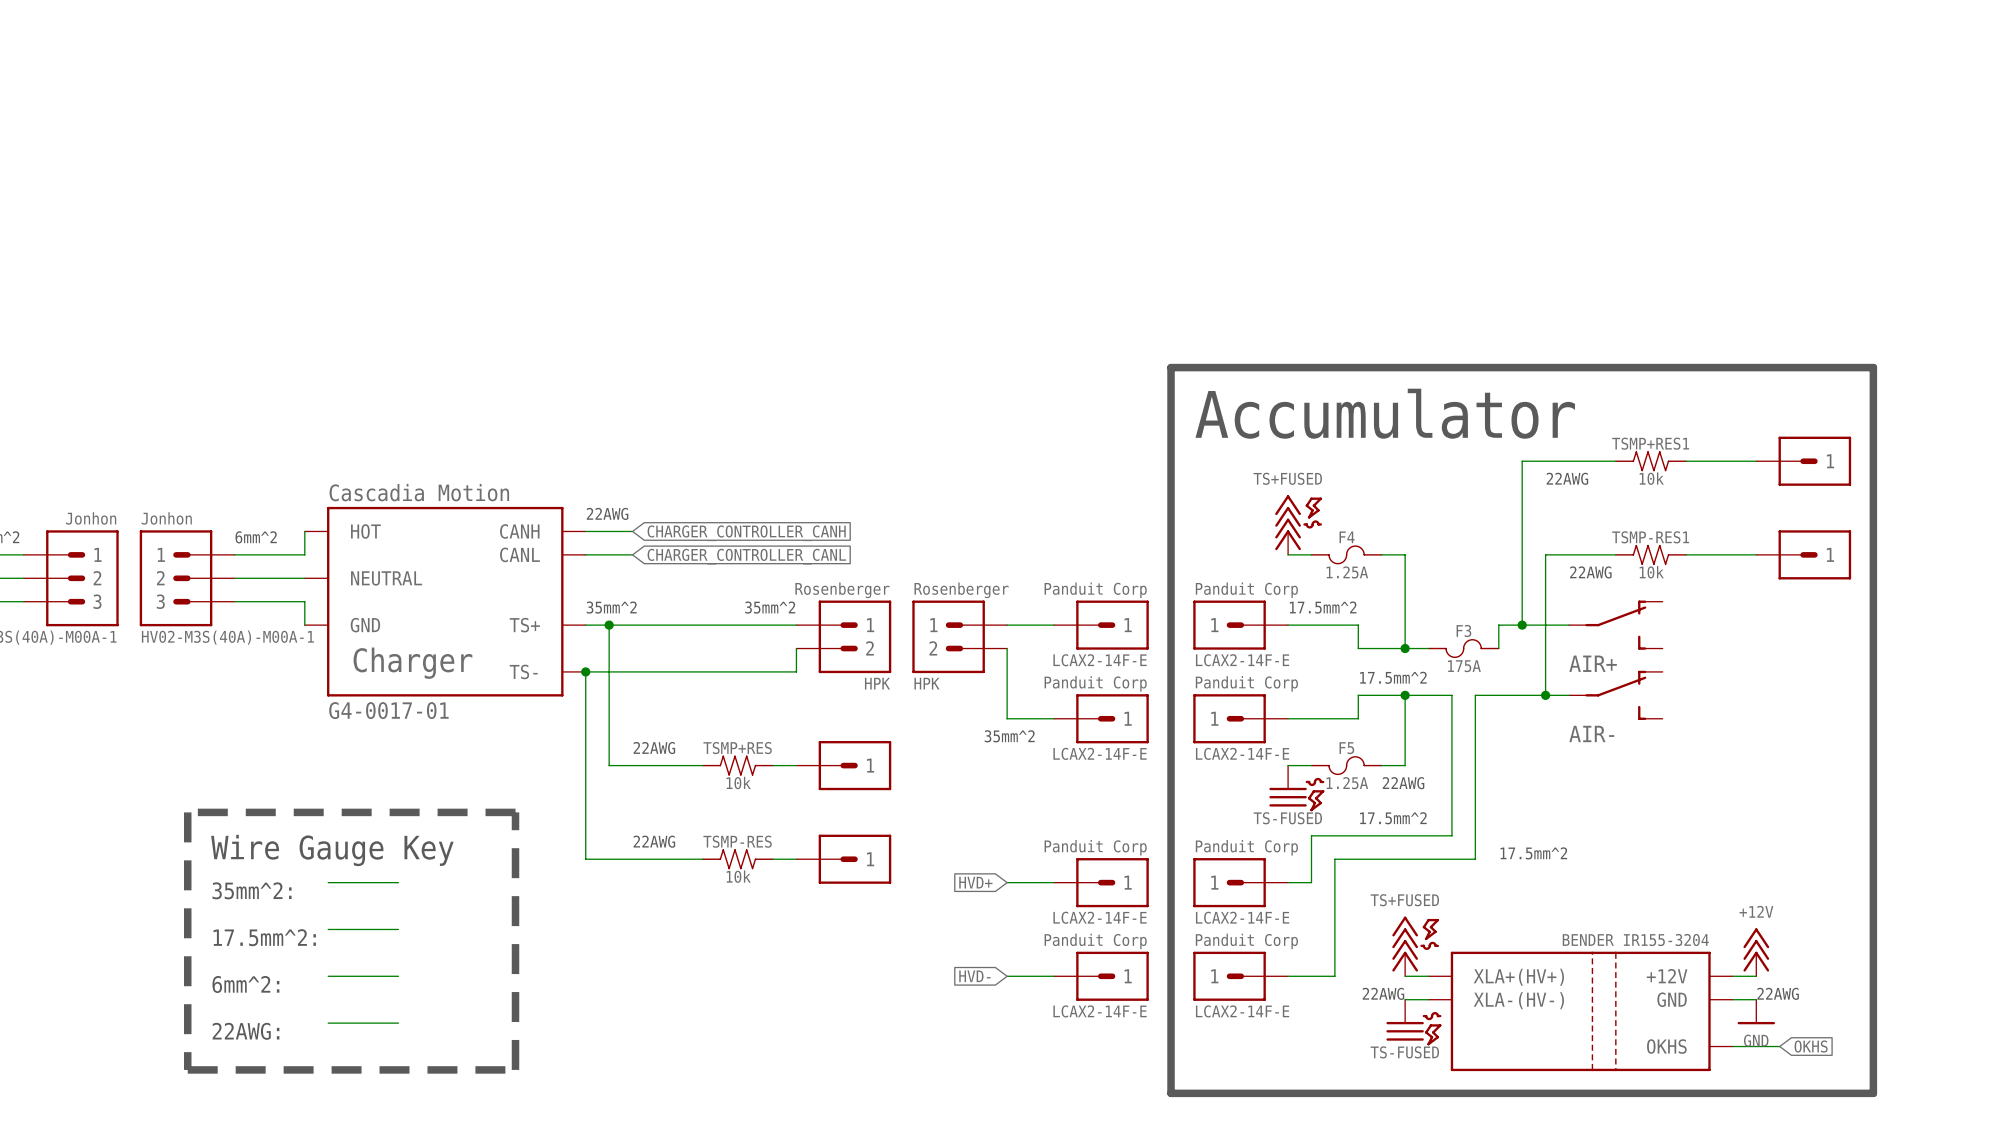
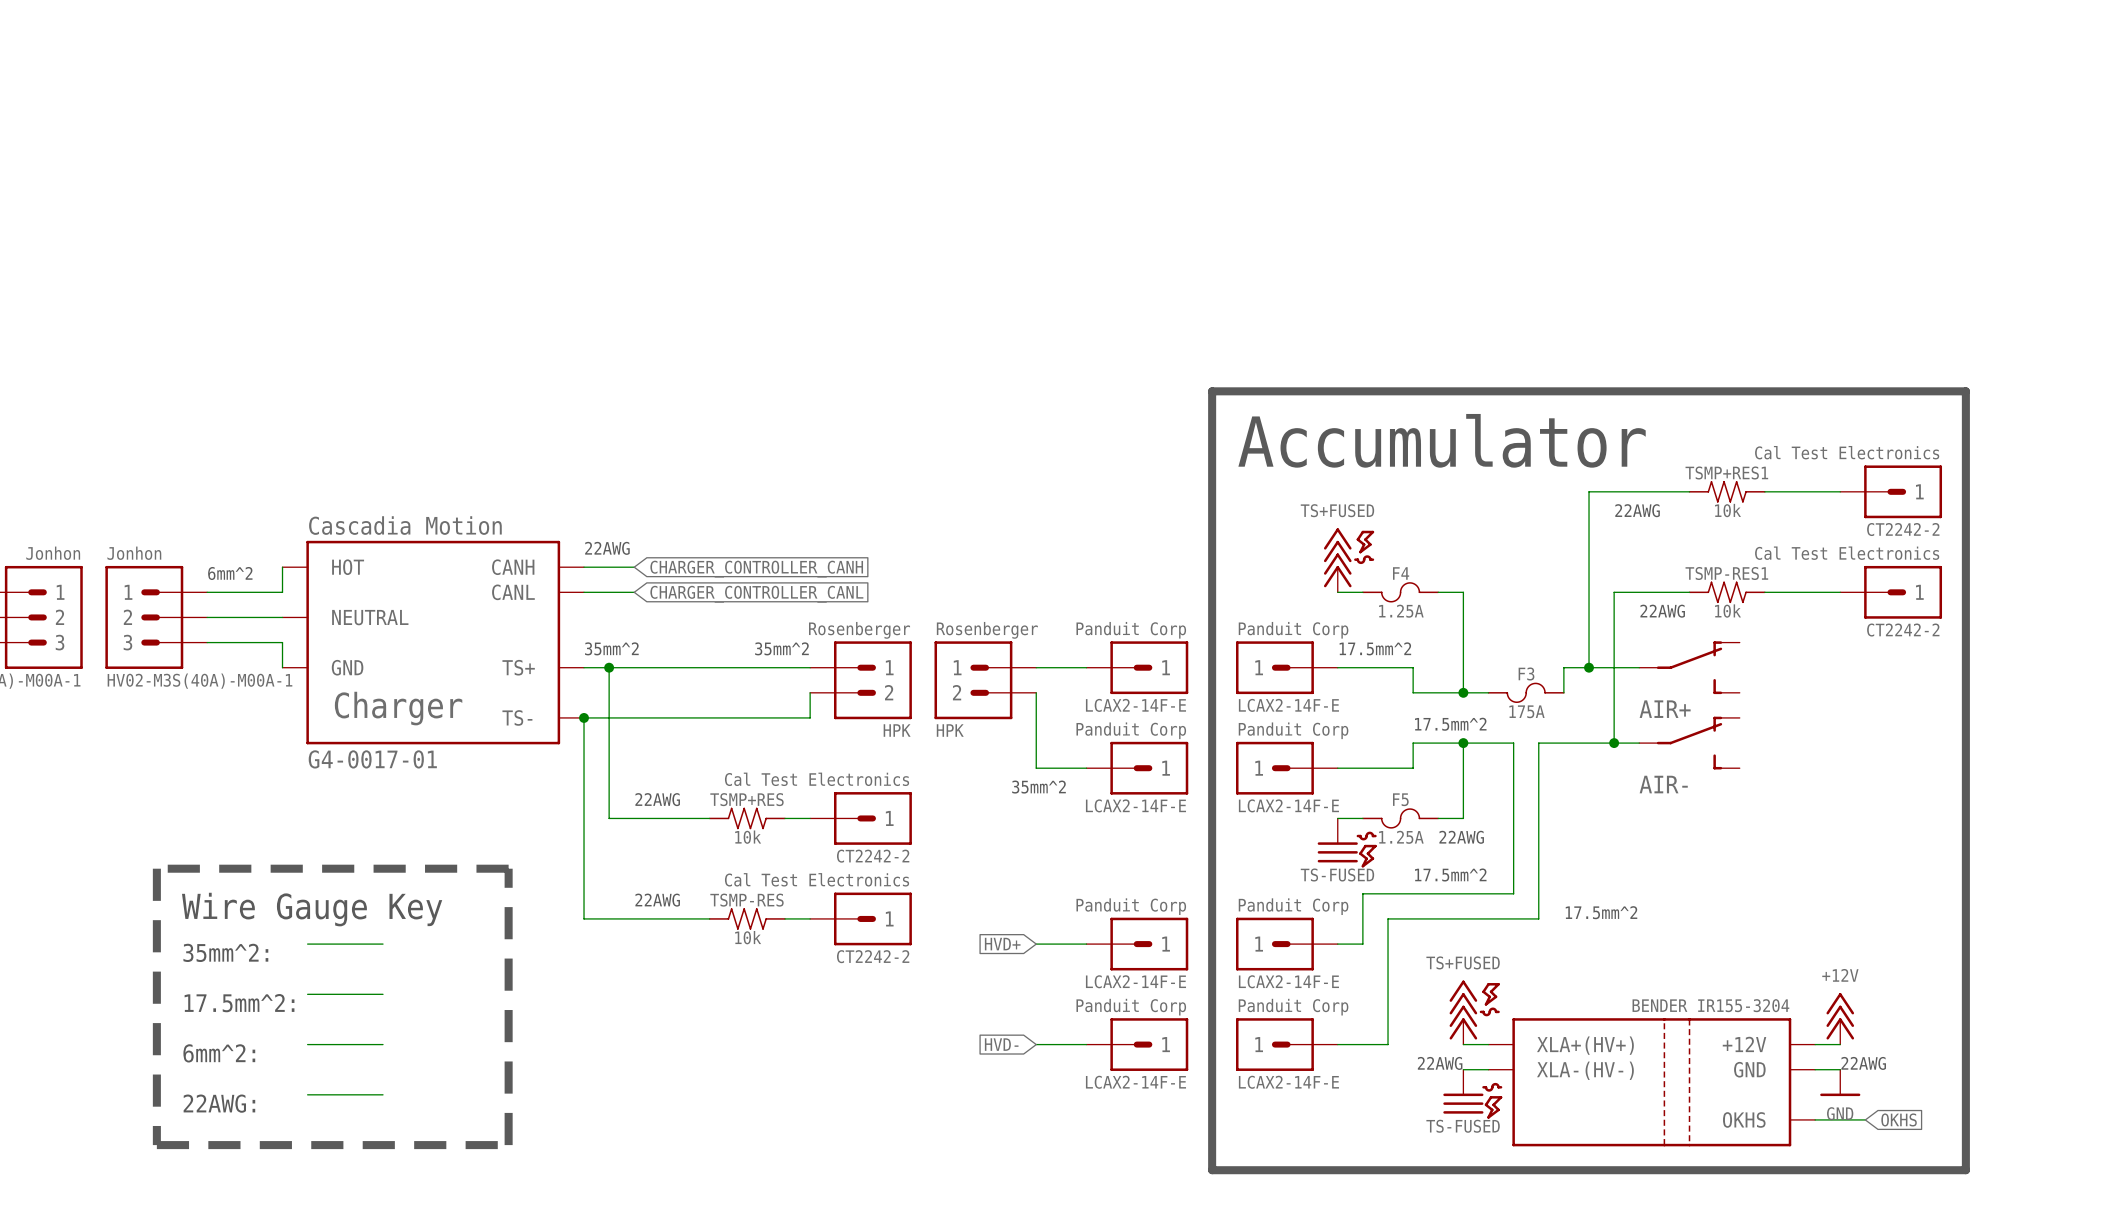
part text: none -> Cal Test Electronics (1847, 452)
part text: none -> CT2242-2 (1903, 529)
part text: none -> Cal Test Electronics (1847, 553)
part text: none -> CT2242-2 (1903, 630)
part text: none -> Cal Test Electronics (817, 779)
part text: none -> CT2242-2 (873, 856)
part text: none -> Cal Test Electronics (817, 879)
part text: none -> CT2242-2 (873, 956)

